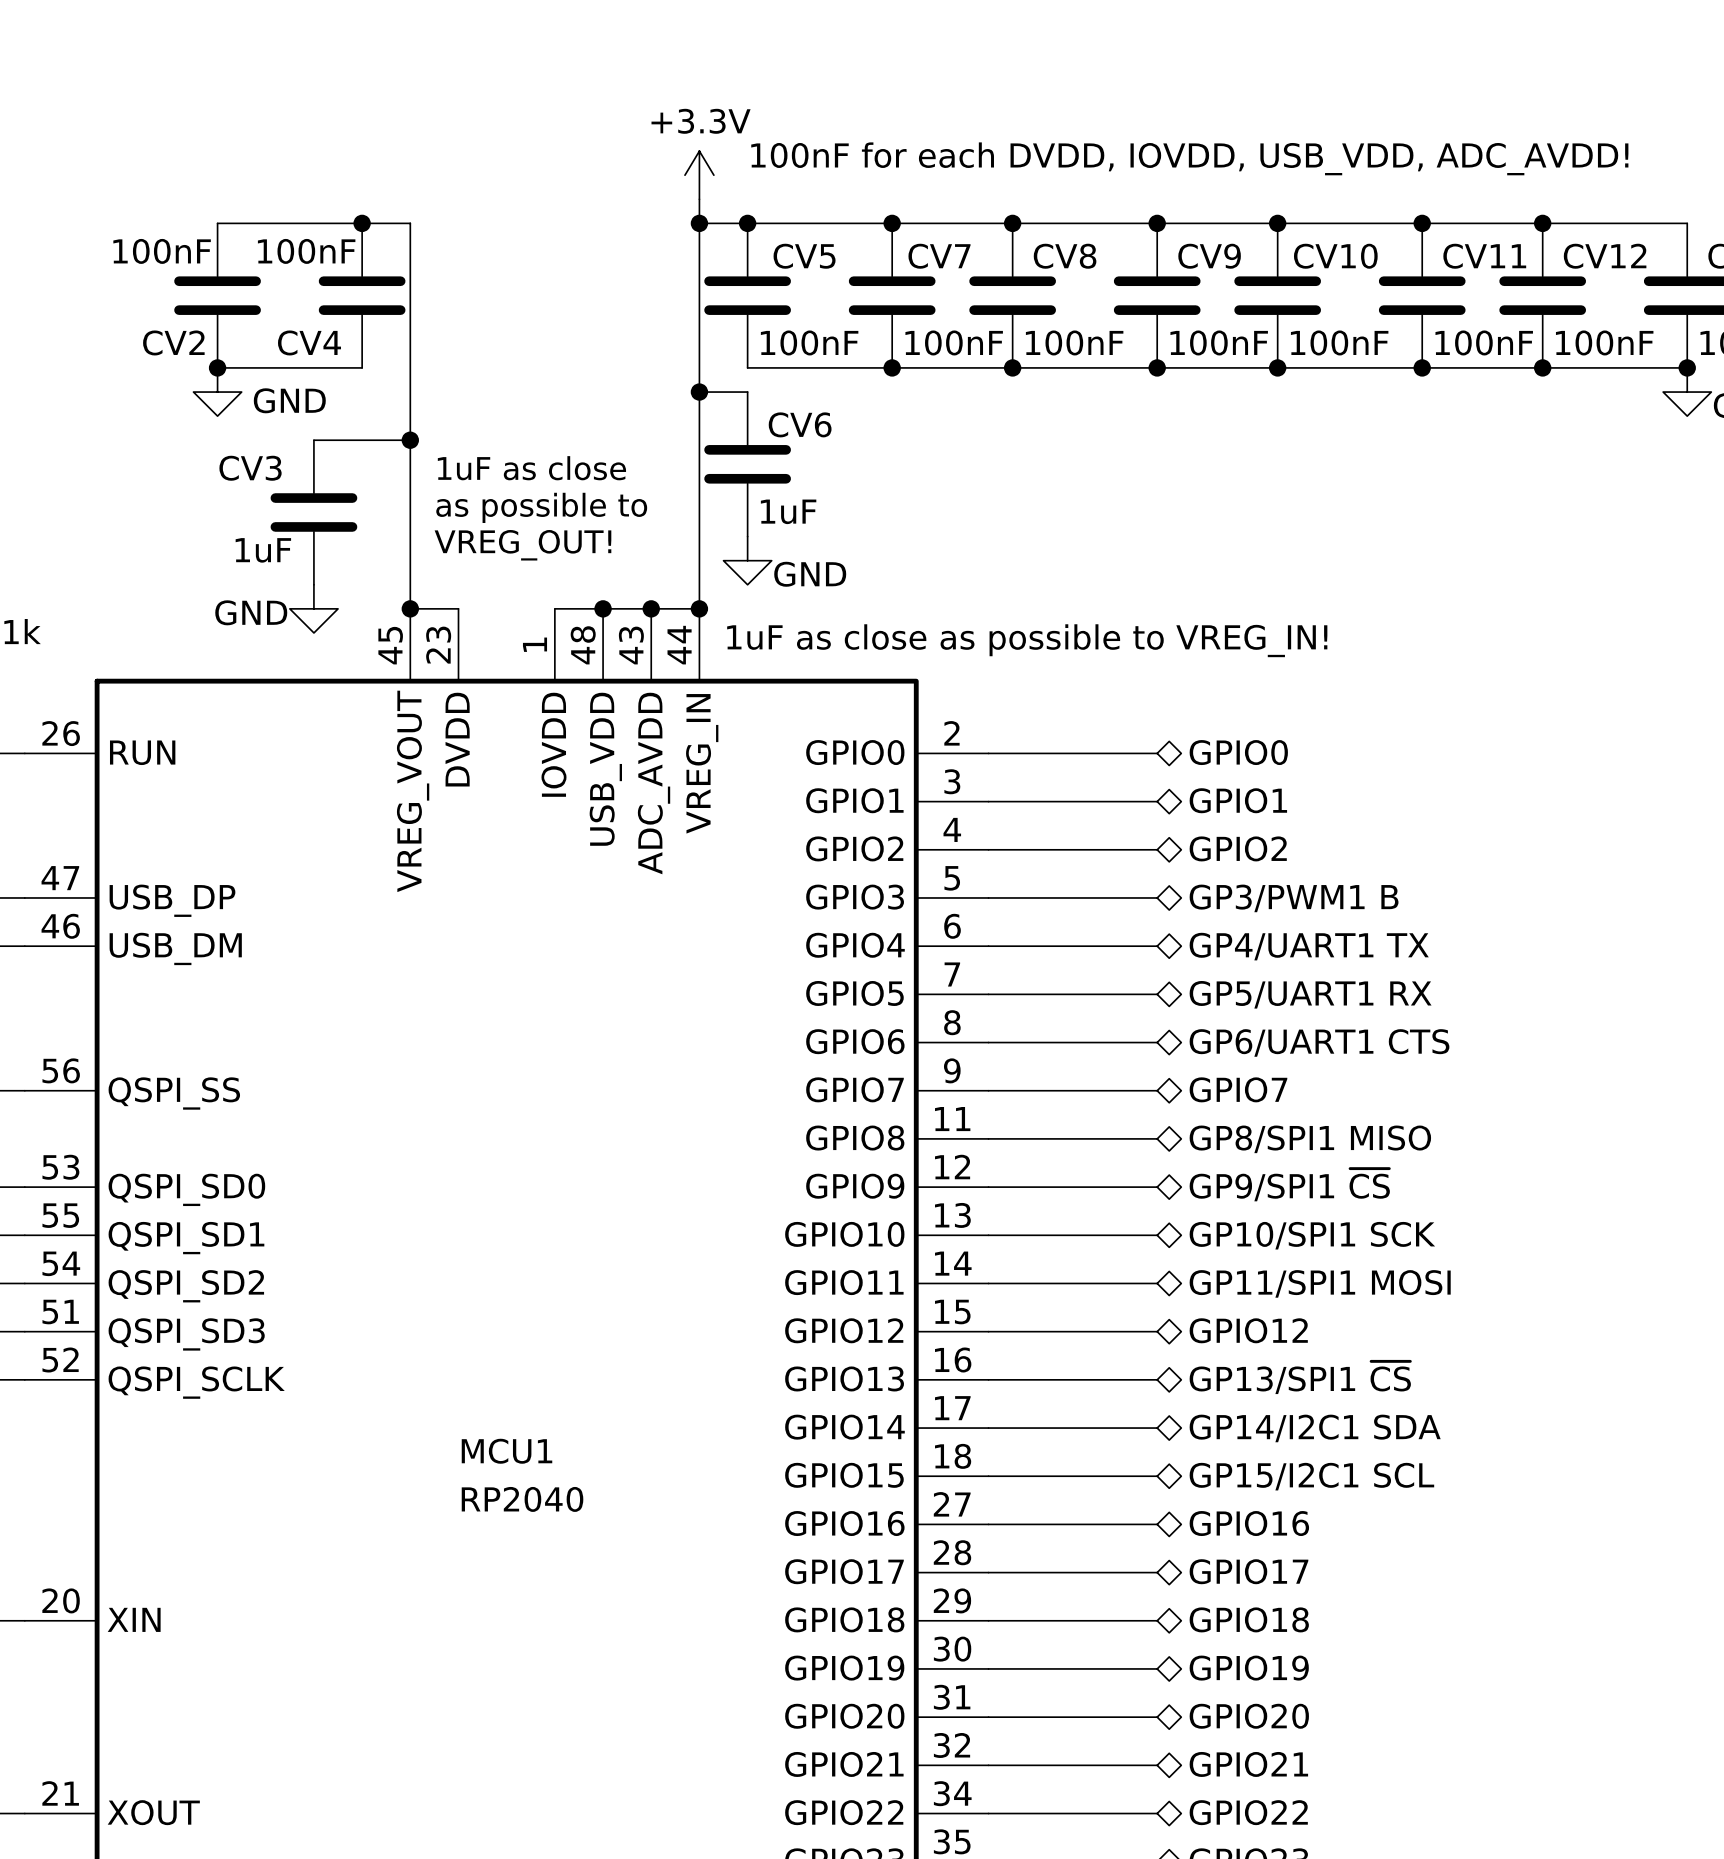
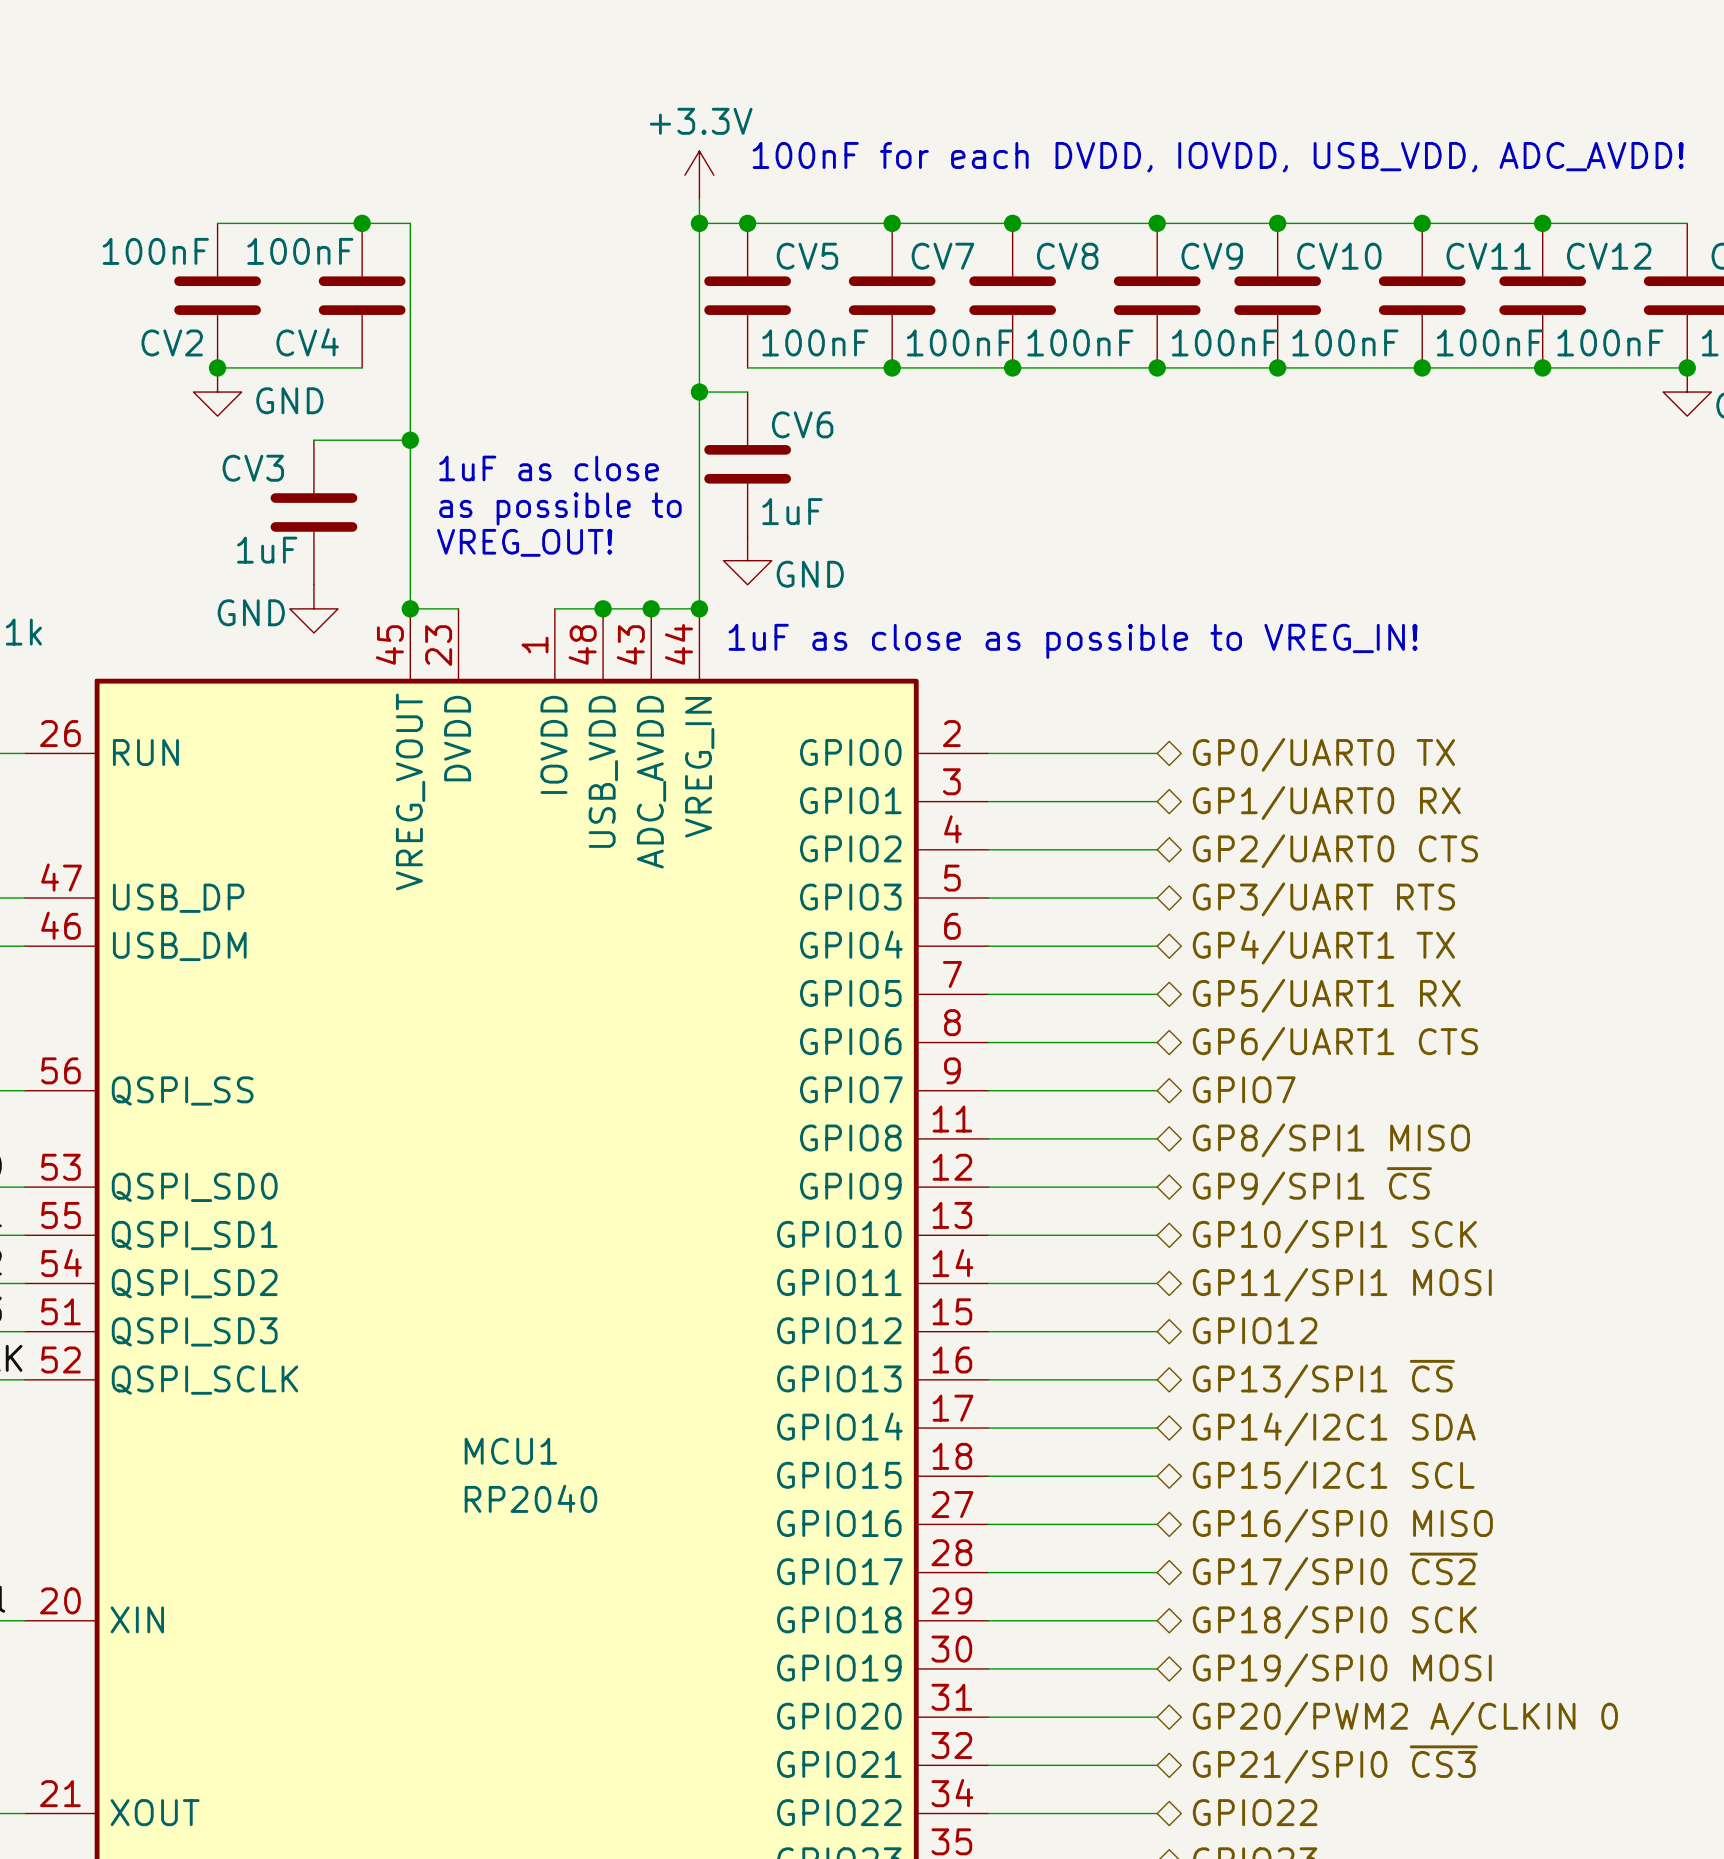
hierarchical label: GPIO0 (1238, 752) -> GP0/UART0 TX (1323, 754)
hierarchical label: GPIO1 (1238, 800) -> GP1/UART0 RX (1326, 803)
hierarchical label: GPIO2 (1238, 848) -> GP2/UART0 CTS (1335, 851)
hierarchical label: GP3/PWM1 B (1294, 898) -> GP3/UART RTS (1323, 899)
hierarchical label: GPIO16 (1249, 1523) -> GP16/SPI0 MISO (1342, 1525)
hierarchical label: GPIO17 (1248, 1571) -> GP17/SPI0 ~{CS2} (1335, 1571)
hierarchical label: GPIO18 (1249, 1619) -> GP18/SPI0 SCK (1334, 1622)
hierarchical label: GPIO19 (1249, 1668) -> GP19/SPI0 MOSI (1342, 1670)
hierarchical label: GPIO20 (1249, 1716) -> GP20/PWM2 A/CLKIN 0 (1405, 1718)
hierarchical label: GPIO21 (1248, 1764) -> GP21/SPI0 ~{CS3} (1335, 1764)

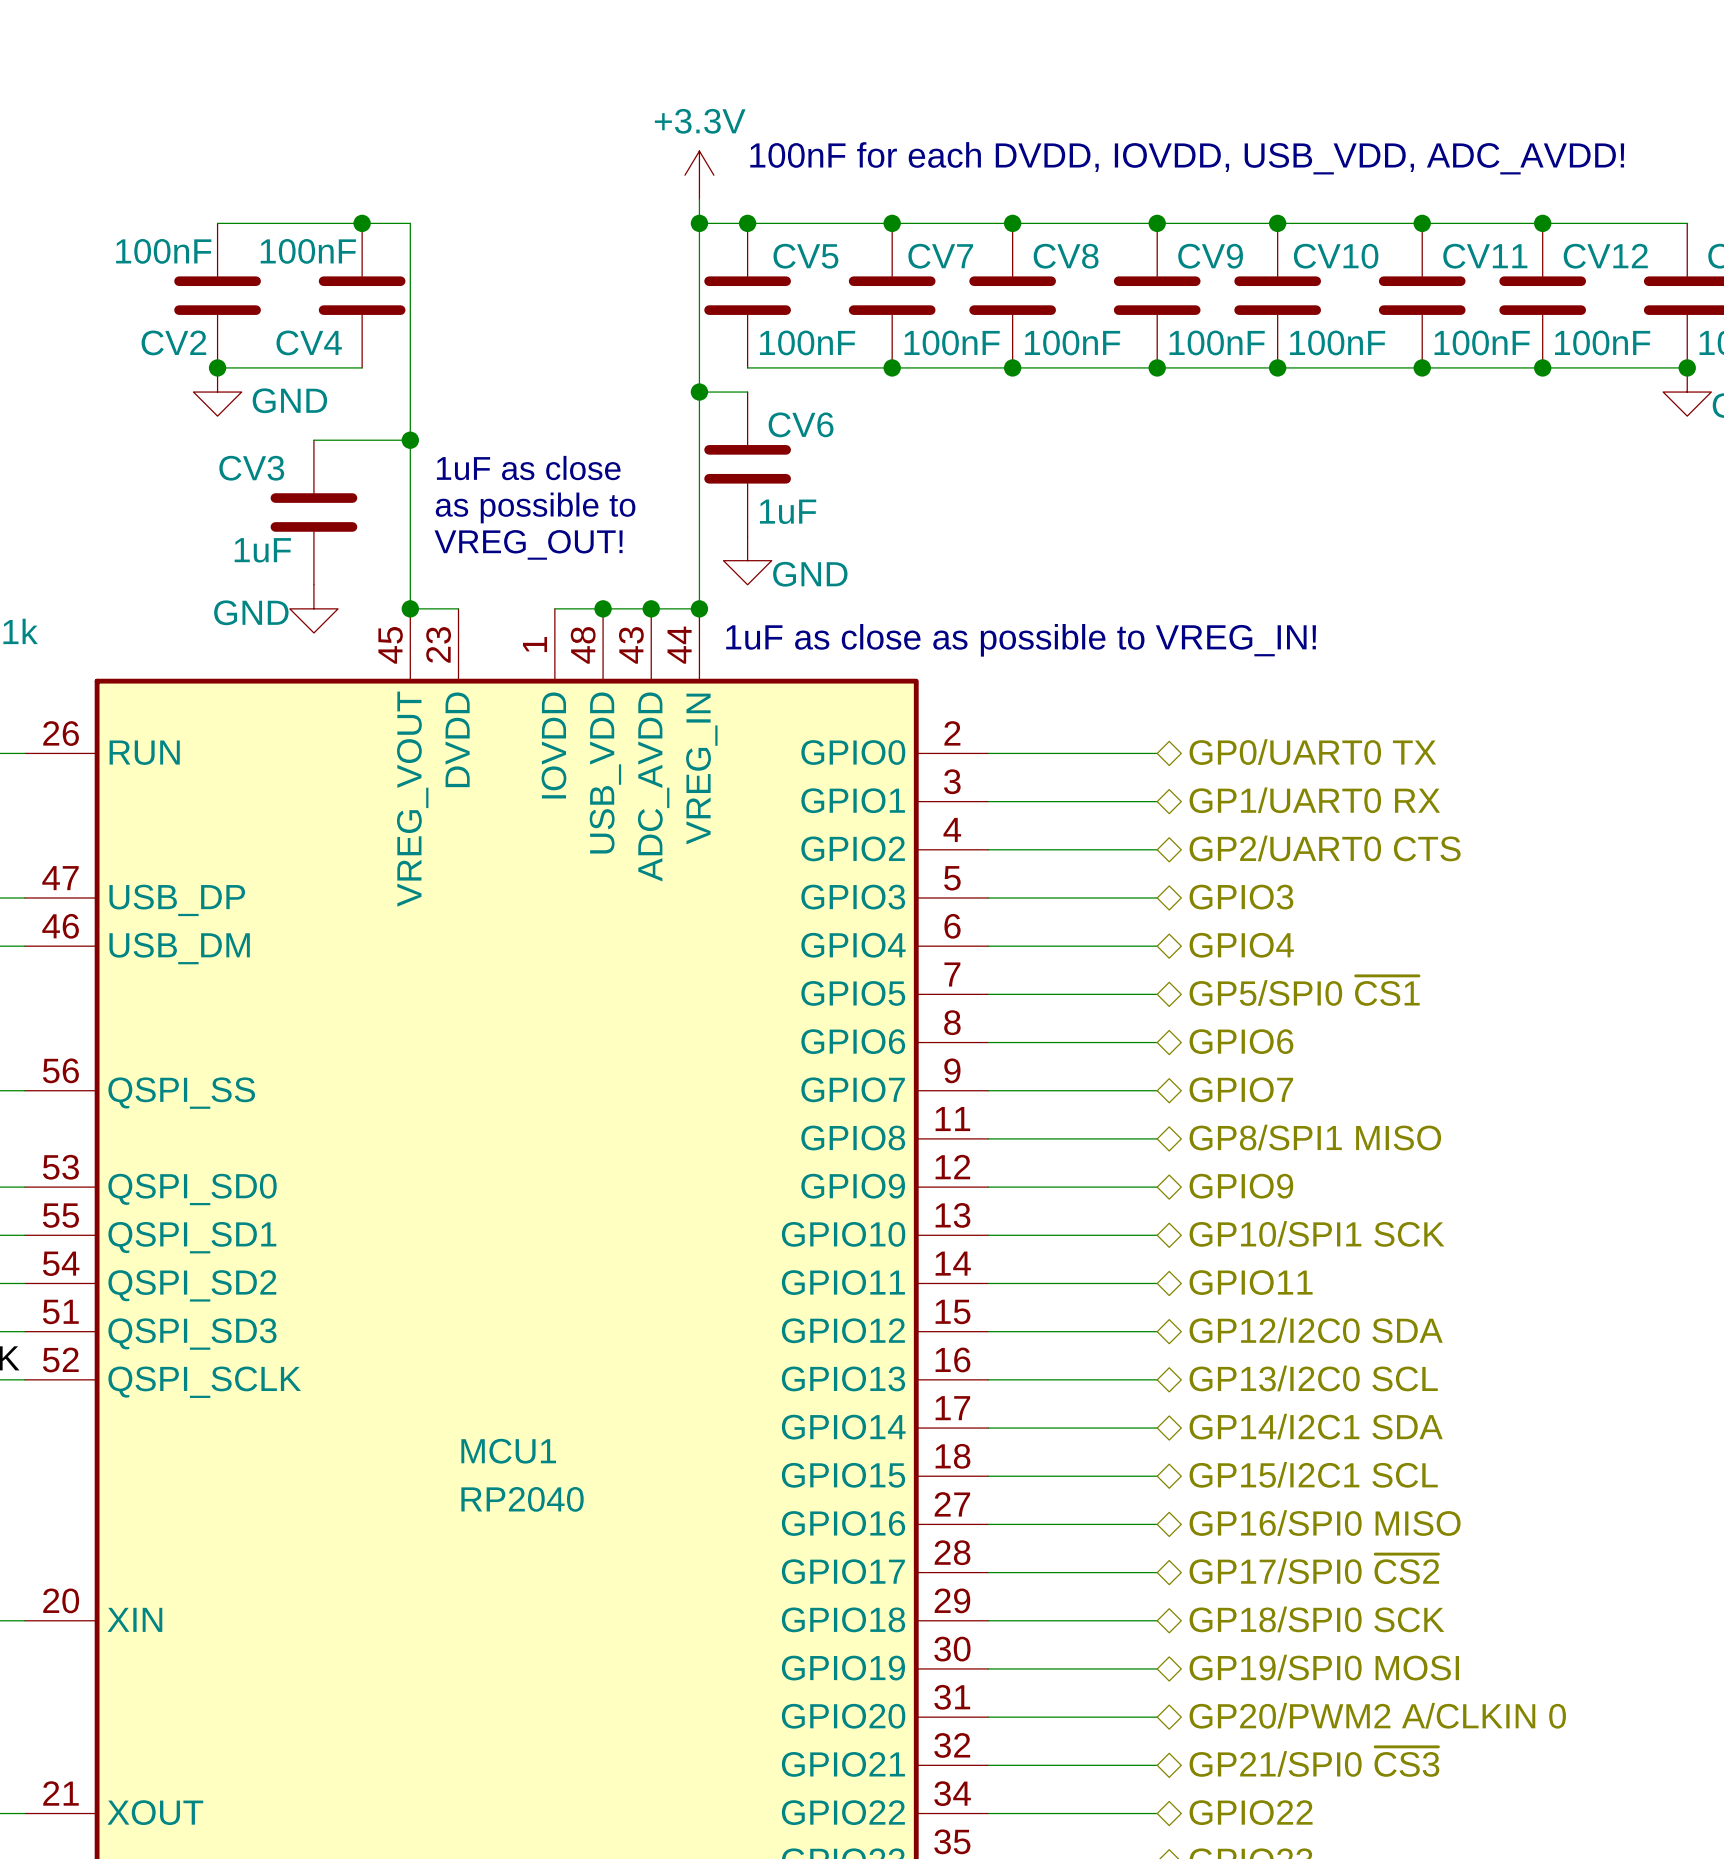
hierarchical label: GP3/UART RTS (1323, 899) -> GPIO3 (1241, 897)
hierarchical label: GP4/UART1 TX (1323, 947) -> GPIO4 (1241, 945)
hierarchical label: GP5/UART1 RX (1326, 995) -> GP5/SPI0 ~{CS1} (1304, 990)
hierarchical label: GP6/UART1 CTS (1335, 1043) -> GPIO6 (1241, 1041)
hierarchical label: GP9/SPI1 ~{CS} (1312, 1186) -> GPIO9 (1241, 1186)
hierarchical label: GP11/SPI1 MOSI (1342, 1284) -> GPIO11 (1251, 1282)
hierarchical label: GPIO12 (1255, 1330) -> GP12/I2C0 SDA (1316, 1330)
hierarchical label: GP13/SPI1 ~{CS} (1323, 1379) -> GP13/I2C0 SCL (1313, 1378)

